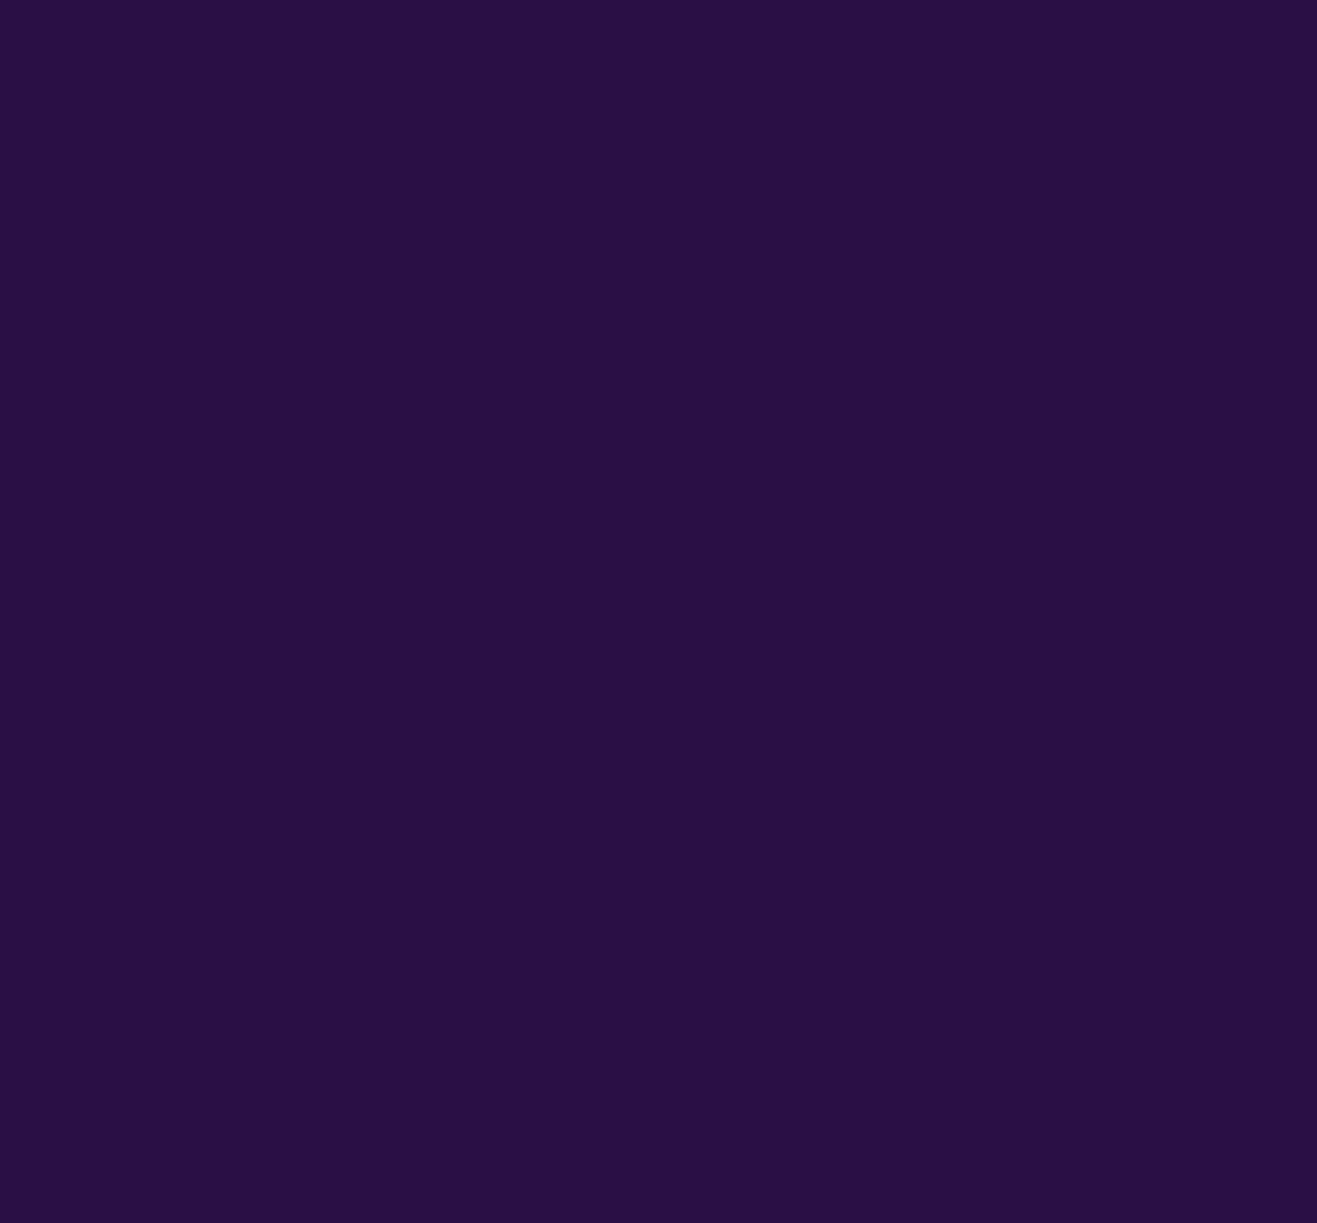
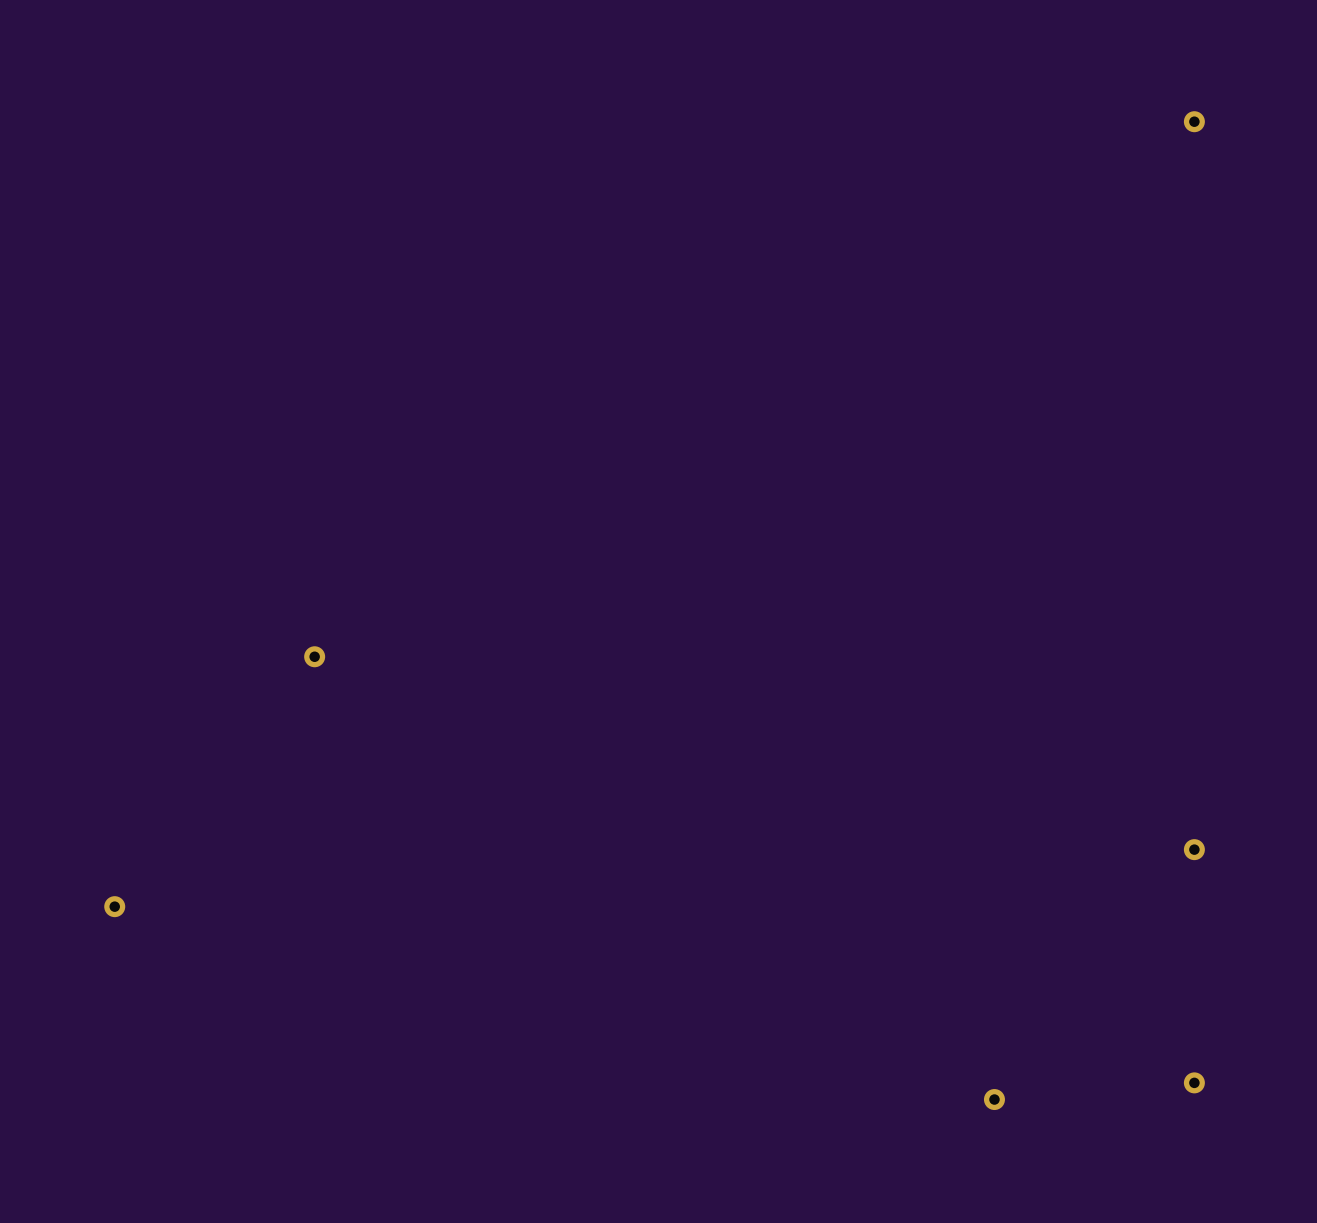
via: none -> (1194, 121)
via: none -> (314, 656)
via: none -> (1194, 849)
via: none -> (114, 906)
via: none -> (1194, 1082)
via: none -> (994, 1099)

